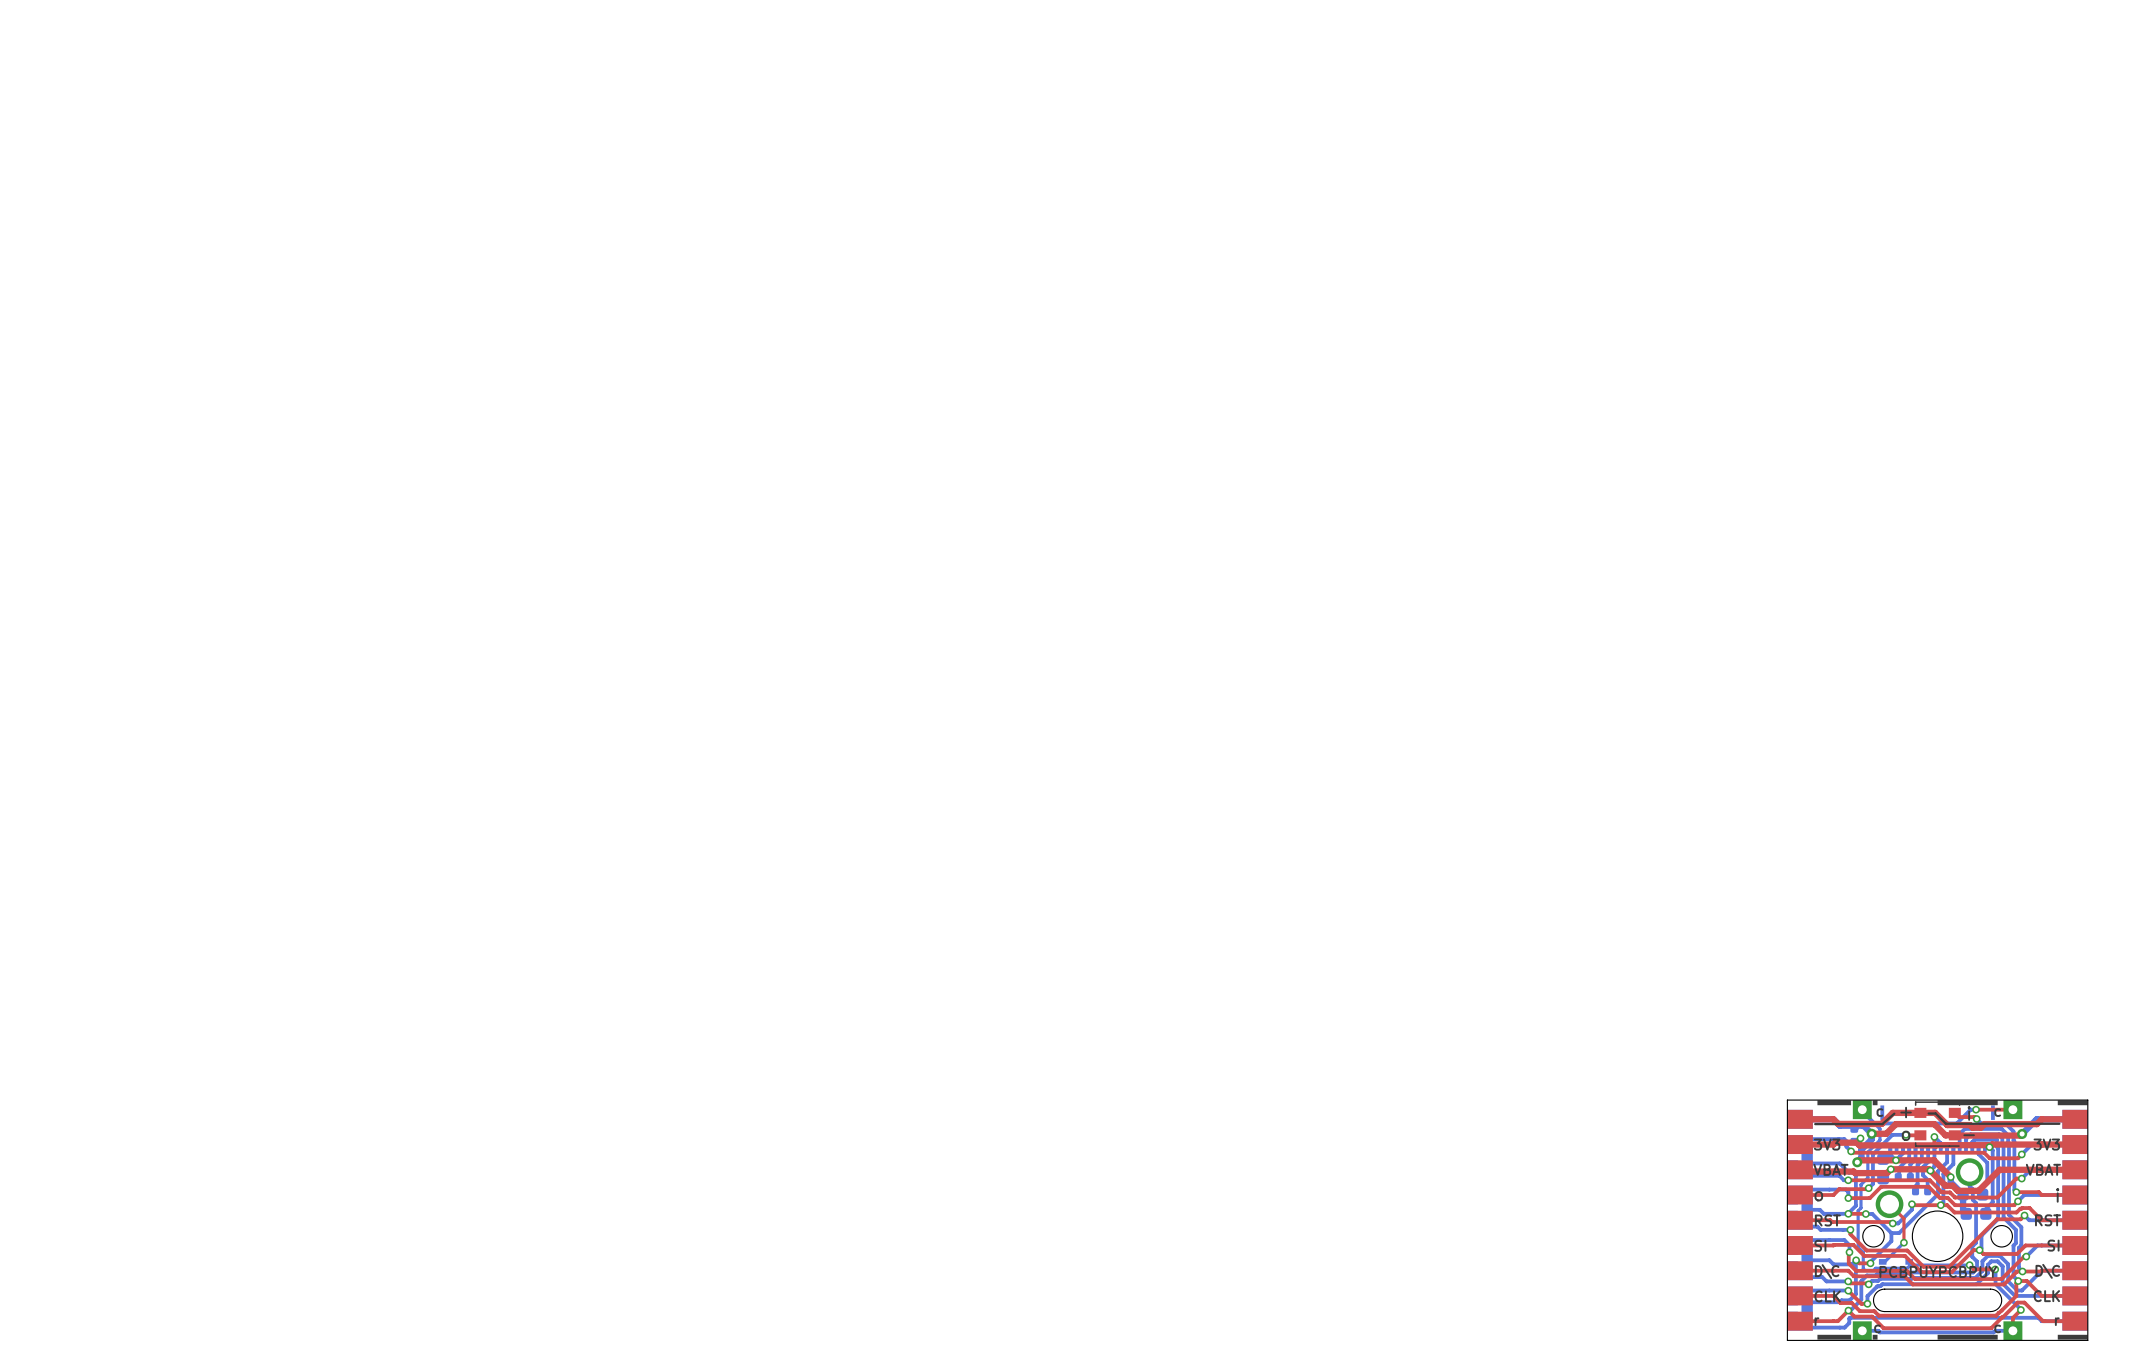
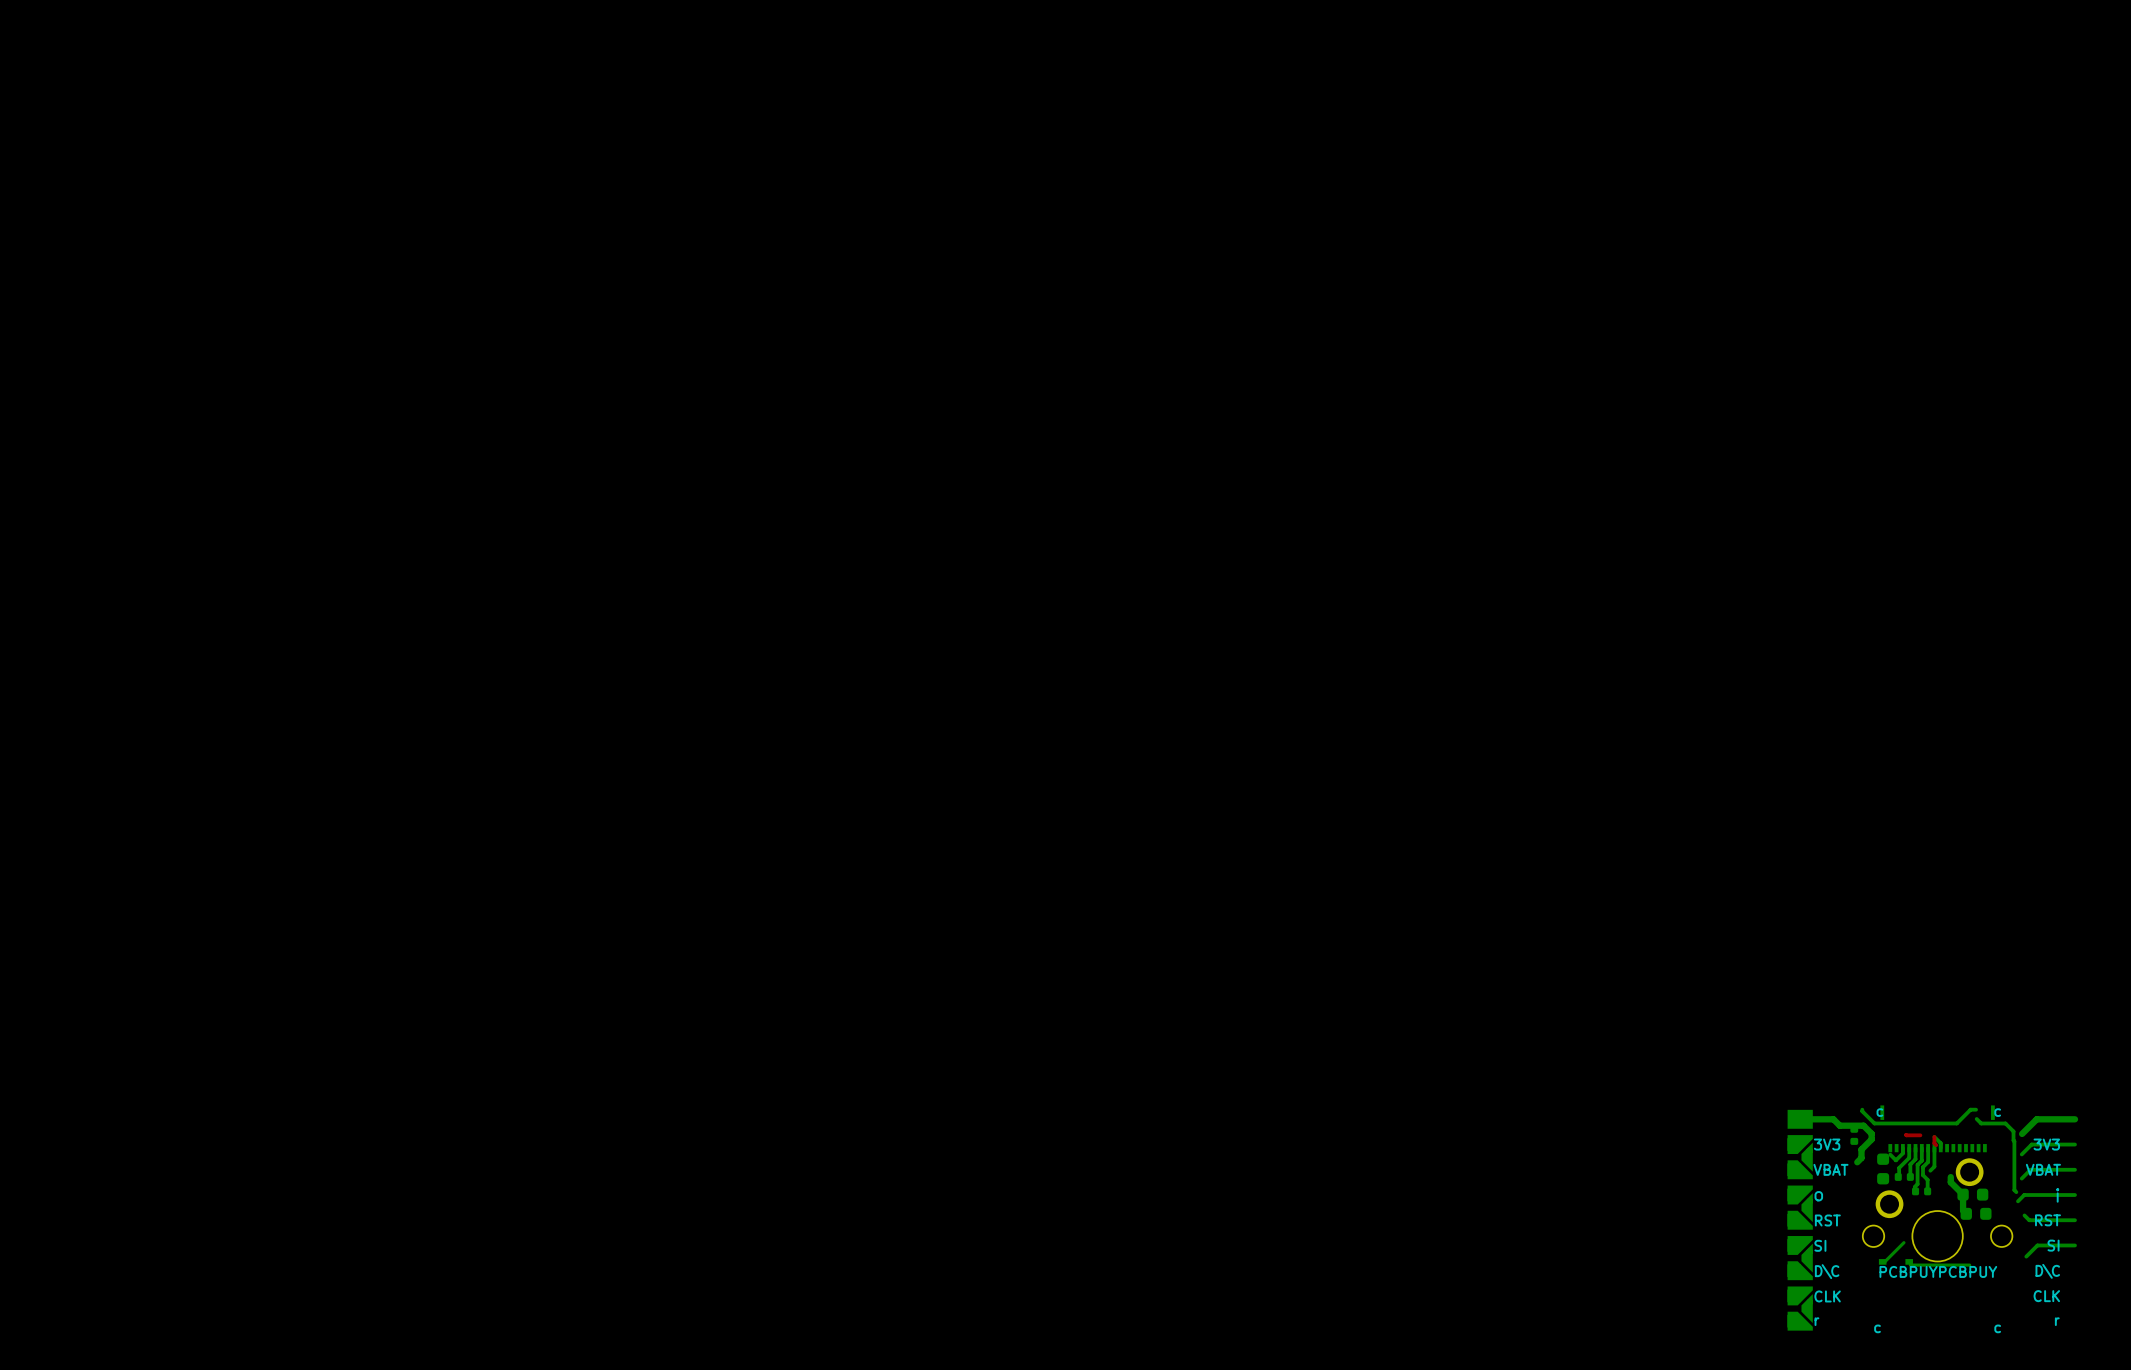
board edge: (1787, 1100) (2087, 1100) (2087, 1340) (1787, 1340) (1787, 1100) -> none
drawing: [1817, 1100, 1852, 1106] -> none
drawing: [1872, 1100, 1878, 1106] -> none
drawing: [1937, 1100, 1998, 1106] -> none
drawing: [2057, 1100, 2088, 1106] -> none
part: (1862, 1109) -> none
top track: (1976, 1109) (2012, 1109) -> none
via: (1976, 1109) -> none
part: (2012, 1109) -> none
top track: (1954, 1112) (1959, 1117) (1974, 1117) (1976, 1118) -> none
line: (1894, 1113) (1882, 1124) (1815, 1124) -> none
line: (1928, 1113) (1935, 1113) (1945, 1123) (2059, 1123) -> none
via: (1976, 1118) -> none
top track: (1800, 1119) (1833, 1119) (1838, 1123) (1881, 1123) (1892, 1112) (1935, 1112) (1947, 1125) (1969, 1125) (1972, 1127) (1980, 1127) (1984, 1124) (2036, 1124) (2041, 1119) (2074, 1119) -> none
bottom track: (1874, 1123) (1879, 1128) (1879, 1140) (1867, 1152) (1867, 1177) (1861, 1184) (1861, 1207) (1858, 1210) (1858, 1247) (1863, 1252) (1863, 1268) (1873, 1270) (1875, 1268) (1907, 1268) (1910, 1265) (1909, 1261) -> none
part: (1937, 1124) -> none
top track: (1871, 1133) (1886, 1133) (1895, 1124) (1934, 1124) (1945, 1135) (2020, 1135) (2022, 1133) -> none
via: (1871, 1133) -> none
via: (2022, 1133) -> none
bottom track: (1905, 1134) (1892, 1134) (1872, 1154) (1872, 1183) (1868, 1188) -> none
via: (1905, 1134) -> none
via: (1934, 1136) -> none
via: (1860, 1138) -> none
bottom track: (1793, 1144) (1799, 1139) (1844, 1139) (1846, 1146) (1851, 1151) -> none
top track: (1800, 1144) (1856, 1142) (1859, 1145) (1987, 1145) (1989, 1147) (1992, 1144) (2074, 1144) -> none
via: (1989, 1147) -> none
bottom track: (1947, 1148) (1947, 1162) (1937, 1171) (1937, 1194) (1899, 1233) (1891, 1233) -> none
bottom track: (1953, 1148) (1953, 1164) (1943, 1174) (1943, 1202) (1940, 1205) -> none
bottom track: (1959, 1148) (1959, 1134) (1964, 1128) (2001, 1128) (2008, 1135) (2008, 1214) (2021, 1227) (2018, 1267) (2022, 1271) -> none
bottom track: (1965, 1148) (1965, 1138) (1970, 1134) (1999, 1134) (2002, 1137) (2003, 1217) (2015, 1229) (2015, 1243) (2013, 1245) (2013, 1276) (2018, 1281) -> none
bottom track: (1972, 1148) (1972, 1142) (1974, 1139) (1996, 1139) (1998, 1219) (1981, 1235) (1981, 1248) (1979, 1250) -> none
bottom track: (1978, 1148) (1978, 1154) (1987, 1162) (1987, 1183) (1982, 1187) (1982, 1194) -> none
bottom track: (1984, 1148) (1989, 1147) (1992, 1150) (1992, 1202) (1982, 1212) -> none
top track: (1851, 1151) (1984, 1152) (1989, 1158) (2017, 1158) (2021, 1154) -> none
via: (1851, 1151) -> none
via: (2021, 1154) -> none
via: (1895, 1160) -> none
bottom track: (1810, 1161) (1811, 1163) (1839, 1163) (1848, 1172) (1853, 1172) (1855, 1175) (1855, 1205) (1848, 1213) (1823, 1213) (1819, 1209) (1812, 1209) -> none
top track: (1857, 1162) (1859, 1160) (1934, 1160) (1950, 1177) -> none
via: (1857, 1162) -> none
bottom track: (1793, 1169) (1799, 1175) (1839, 1175) (1843, 1180) (1848, 1180) -> none
top track: (1800, 1169) (1801, 1171) (1886, 1173) (1890, 1169) (1928, 1169) (1945, 1185) (1952, 1185) (1957, 1190) (1978, 1190) (1999, 1169) (2074, 1169) -> none
via: (1890, 1169) -> none
via: (1930, 1170) -> none
bottom track: (1969, 1172) (1969, 1186) (1972, 1189) (1972, 1199) (1976, 1203) (1976, 1242) (1972, 1246) (1972, 1256) (1977, 1261) (1977, 1268) (1973, 1272) (1877, 1273) (1875, 1275) (1866, 1275) (1861, 1281) (1861, 1299) (1848, 1310) -> none
via: (1950, 1177) -> none
top track: (2021, 1178) (2016, 1178) (1997, 1197) (1955, 1197) (1949, 1192) (1943, 1192) -> none
via: (2021, 1178) -> none
top track: (1848, 1180) (1929, 1180) (1943, 1192) -> none
via: (1848, 1180) -> none
top track: (1868, 1188) (1839, 1189) (1833, 1195) (1800, 1195) -> none
via: (1868, 1188) -> none
top track: (2016, 1192) (2038, 1192) (2041, 1195) (2074, 1195) -> none
via: (2016, 1192) -> none
bottom track: (1793, 1195) (1799, 1189) (1846, 1189) (1848, 1191) (1848, 1198) -> none
top track: (1941, 1197) (1928, 1186) (1881, 1186) (1869, 1198) (1848, 1198) -> none
top track: (1941, 1197) (1947, 1197) (1955, 1205) (2014, 1205) (2017, 1201) -> none
via: (1848, 1198) -> none
via: (2017, 1201) -> none
top track: (1889, 1204) (1903, 1218) (1903, 1242) -> none
bottom track: (1911, 1204) (1911, 1209) (1898, 1223) (1892, 1223) -> none
top track: (1911, 1204) (1947, 1205) (1954, 1212) (2016, 1212) (2022, 1208) (2029, 1208) (2041, 1220) (2074, 1220) -> none
via: (1911, 1204) -> none
via: (1940, 1205) -> none
top track: (1848, 1213) (1865, 1213) -> none
via: (1848, 1213) -> none
bottom track: (1865, 1213) (1872, 1213) (1891, 1233) -> none
via: (1865, 1213) -> none
top track: (2024, 1215) (2020, 1219) (1996, 1219) (1949, 1266) (1923, 1266) (1907, 1250) (1866, 1250) (1850, 1234) (1850, 1229) -> none
via: (2024, 1215) -> none
bottom track: (1793, 1220) (1800, 1226) (1817, 1226) (1820, 1229) (1850, 1229) -> none
top track: (1800, 1220) (1892, 1223) -> none
part: (1800, 1220) -> none
part: (2074, 1220) -> none
via: (1892, 1223) -> none
via: (1850, 1229) -> none
bottom track: (1891, 1233) (1891, 1241) (1870, 1263) -> none
via: (1903, 1242) -> none
bottom track: (1793, 1245) (1799, 1240) (1844, 1240) (1849, 1245) (1849, 1252) -> none
top track: (1800, 1245) (1853, 1244) (1864, 1255) (1905, 1255) (1921, 1272) (1951, 1272) (1973, 1250) (1979, 1250) (1983, 1253) (2017, 1253) (2025, 1245) (2074, 1245) -> none
via: (1979, 1250) -> none
top track: (1849, 1252) (1848, 1263) (1856, 1270) (1906, 1270) (1915, 1279) (2001, 1279) (2024, 1256) (2026, 1256) -> none
via: (1849, 1252) -> none
via: (2026, 1256) -> none
bottom track: (1812, 1260) (1829, 1260) (1833, 1264) (1852, 1264) (1856, 1260) -> none
bottom track: (1855, 1260) (1855, 1294) (1849, 1300) (1809, 1302) -> none
top track: (1856, 1260) (1859, 1263) (1870, 1263) -> none
via: (1856, 1260) -> none
via: (1870, 1263) -> none
top track: (1969, 1265) (1973, 1269) (1995, 1269) -> none
via: (1969, 1265) -> none
bottom track: (1995, 1269) (1995, 1284) (2020, 1309) -> none
via: (1995, 1269) -> none
bottom track: (1793, 1270) (1800, 1277) (1822, 1277) (1826, 1281) (1848, 1281) -> none
top track: (1800, 1270) (1848, 1270) (1853, 1276) (1904, 1276) (1912, 1284) (2004, 1284) (2017, 1271) (2074, 1270) -> none
bottom track: (2074, 1270) (2041, 1270) (2021, 1290) (2017, 1290) (2008, 1281) (2008, 1264) (1999, 1255) (1987, 1255) (1982, 1261) (1982, 1270) (1975, 1277) (1880, 1278) (1878, 1280) (1872, 1280) (1868, 1284) -> none
via: (2022, 1271) -> none
top track: (1848, 1281) (1850, 1283) (1868, 1284) -> none
via: (1848, 1281) -> none
via: (2018, 1281) -> none
via: (1868, 1284) -> none
board edge: (1884, 1289) (1991, 1289) (1999, 1293) (2001, 1301) (1998, 1308) (1991, 1311) (1883, 1311) (1875, 1307) (1873, 1298) (1877, 1291) (1884, 1289) -> none
bottom track: (1848, 1290) (1799, 1290) (1793, 1295) -> none
top track: (1848, 1290) (1861, 1303) (1867, 1303) -> none
via: (1848, 1290) -> none
top track: (1800, 1295) (1833, 1295) (1840, 1303) (1851, 1303) (1859, 1311) (1874, 1311) (1878, 1315) (1996, 1315) (2016, 1295) (2016, 1282) (2018, 1281) (2026, 1281) (2041, 1295) (2074, 1295) -> none
bottom track: (2074, 1295) (2015, 1295) (2002, 1283) (2002, 1266) (1997, 1261) (1991, 1261) (1987, 1264) (1987, 1273) (1976, 1284) (1882, 1284) (1877, 1286) (1867, 1296) (1867, 1303) -> none
via: (1867, 1303) -> none
top track: (2020, 1309) (2012, 1317) (2012, 1330) -> none
via: (2020, 1309) -> none
via: (1848, 1310) -> none
bottom track: (1793, 1321) (1800, 1327) (1844, 1327) (1849, 1322) (1850, 1317) (2038, 1317) (2041, 1321) (2074, 1321) -> none
top track: (1800, 1321) (1837, 1321) (1848, 1310) (1854, 1316) (1872, 1316) (1883, 1328) (1991, 1328) (2017, 1302) (2024, 1302) (2043, 1321) (2074, 1321) -> none
bottom track: (1862, 1330) (1879, 1332) (2012, 1330) -> none
part: (1862, 1330) -> none
part: (2012, 1330) -> none
drawing: [1817, 1334, 1852, 1340] -> none
drawing: [1872, 1334, 1878, 1340] -> none
drawing: [1937, 1334, 1998, 1340] -> none
drawing: [2057, 1334, 2088, 1340] -> none

